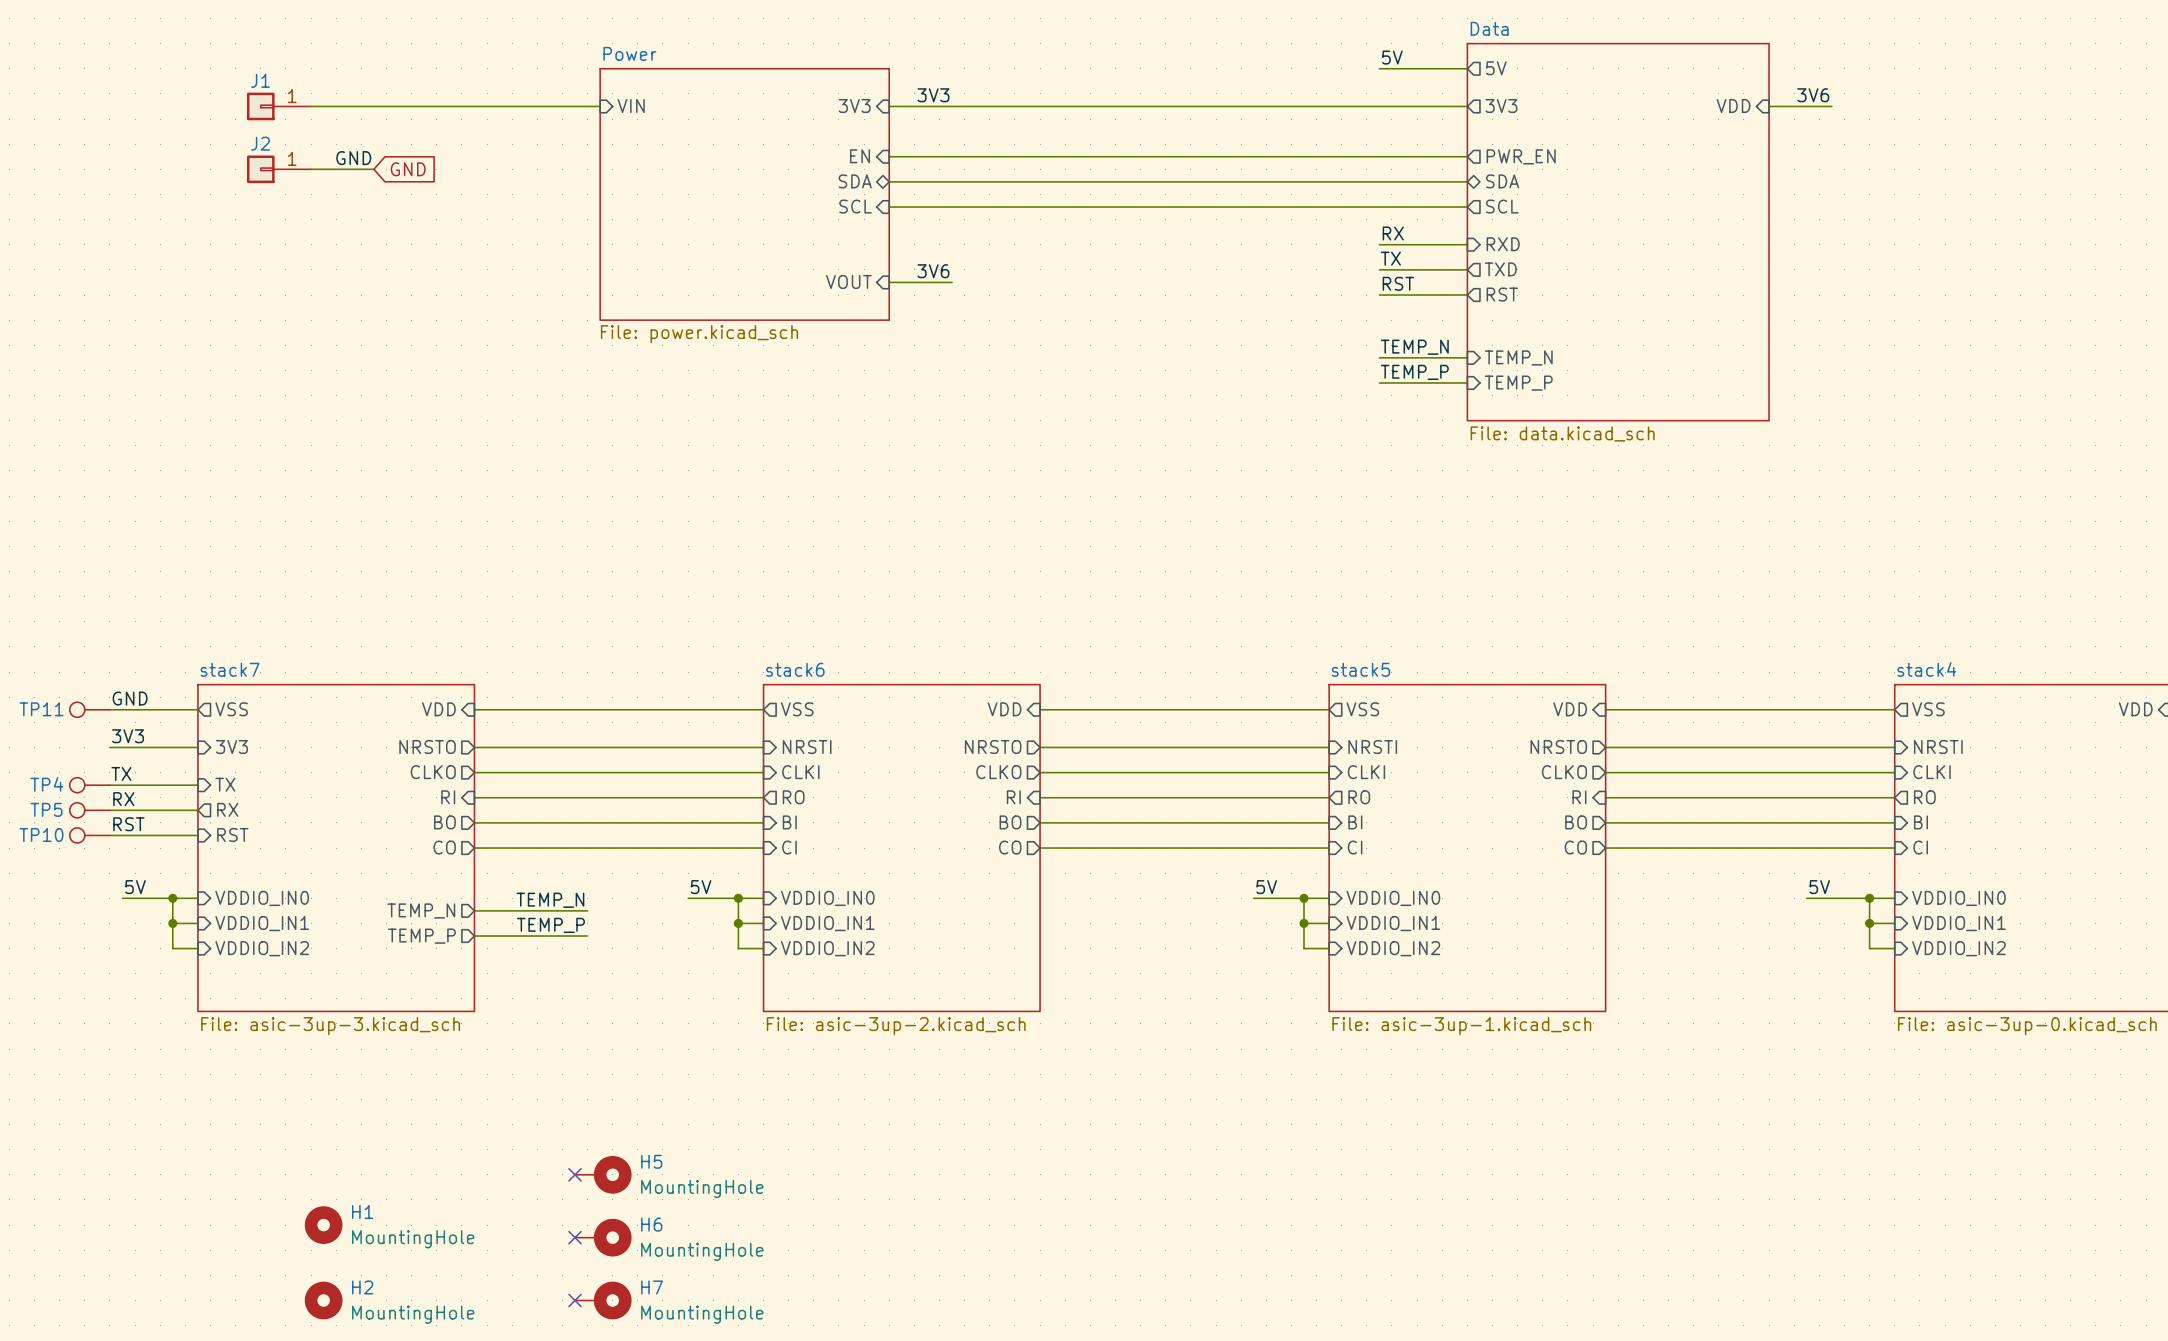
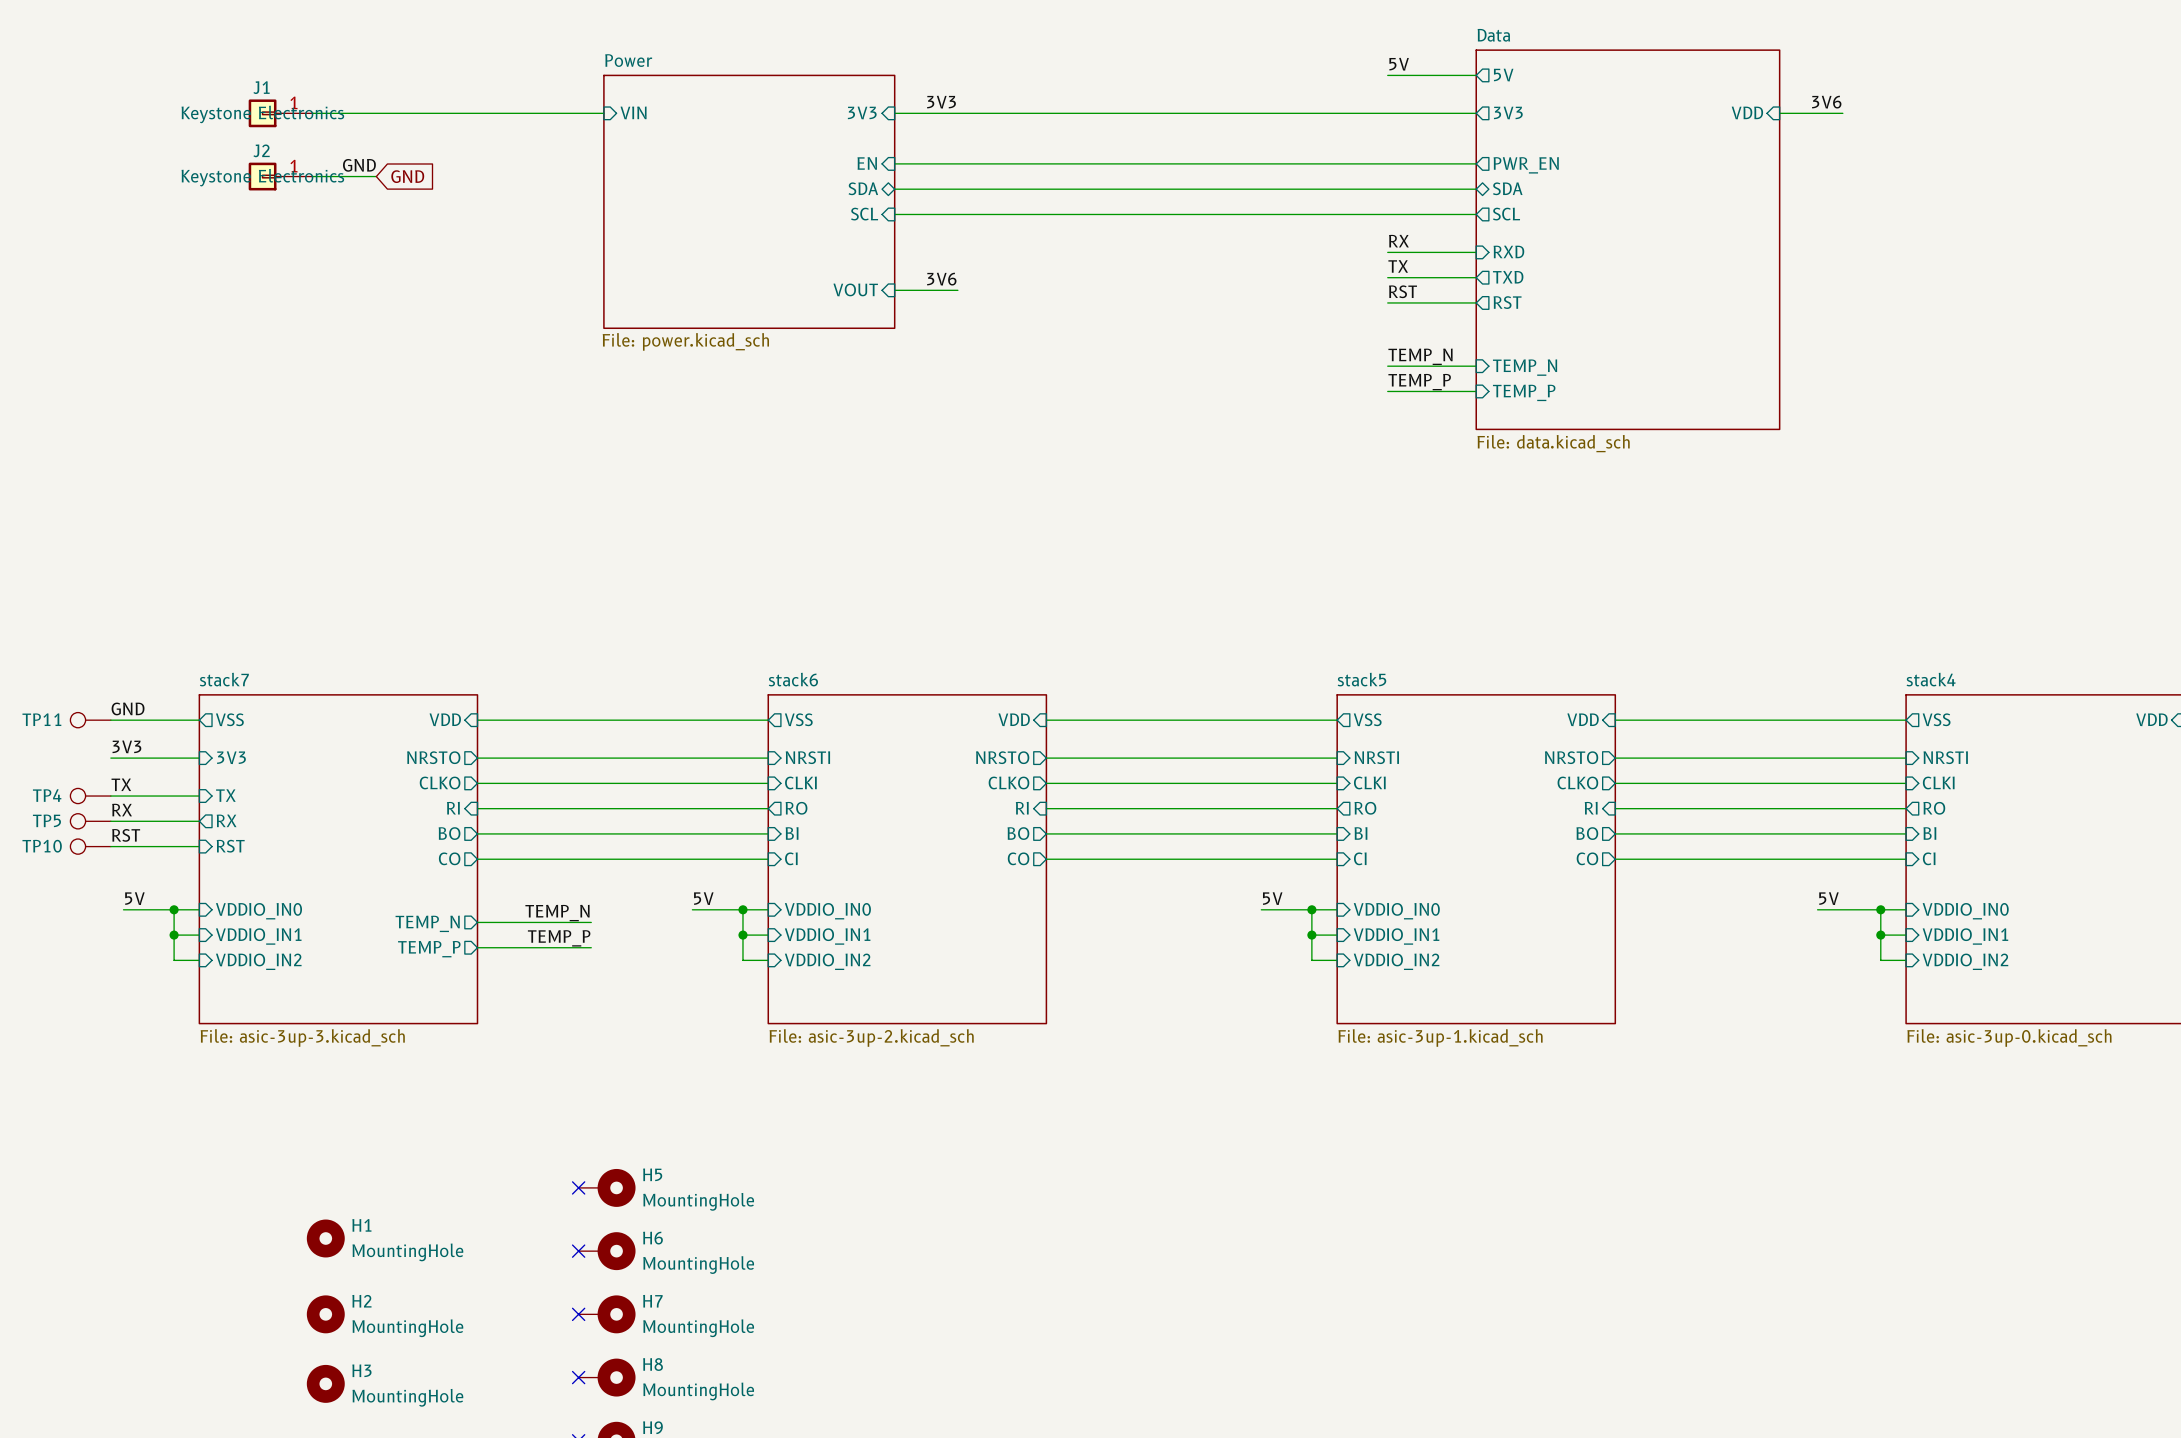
J1 text: none -> Keystone Electronics (262, 114)
J2 text: none -> Keystone Electronics (262, 177)

